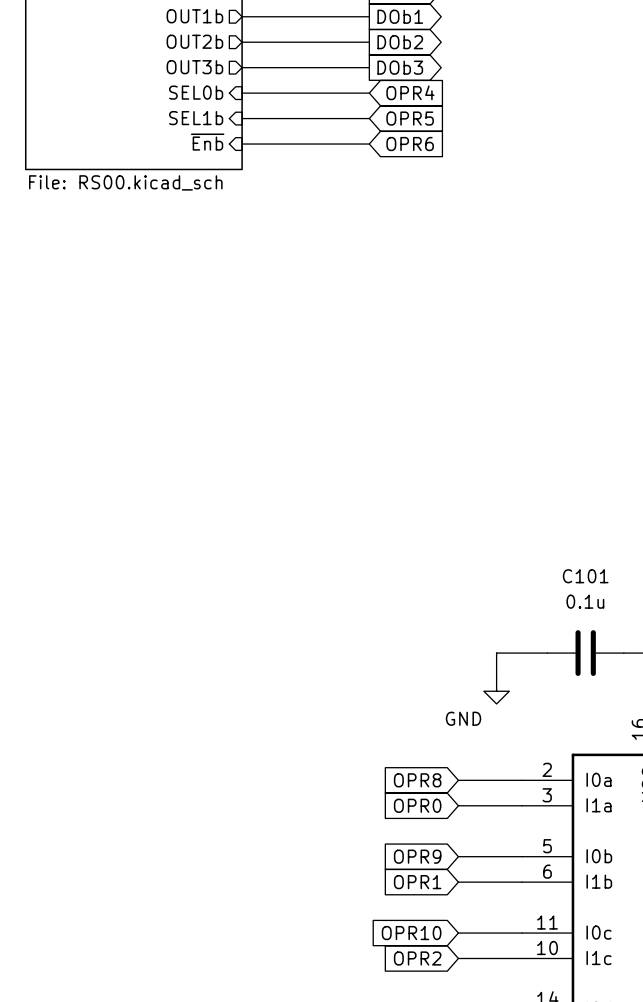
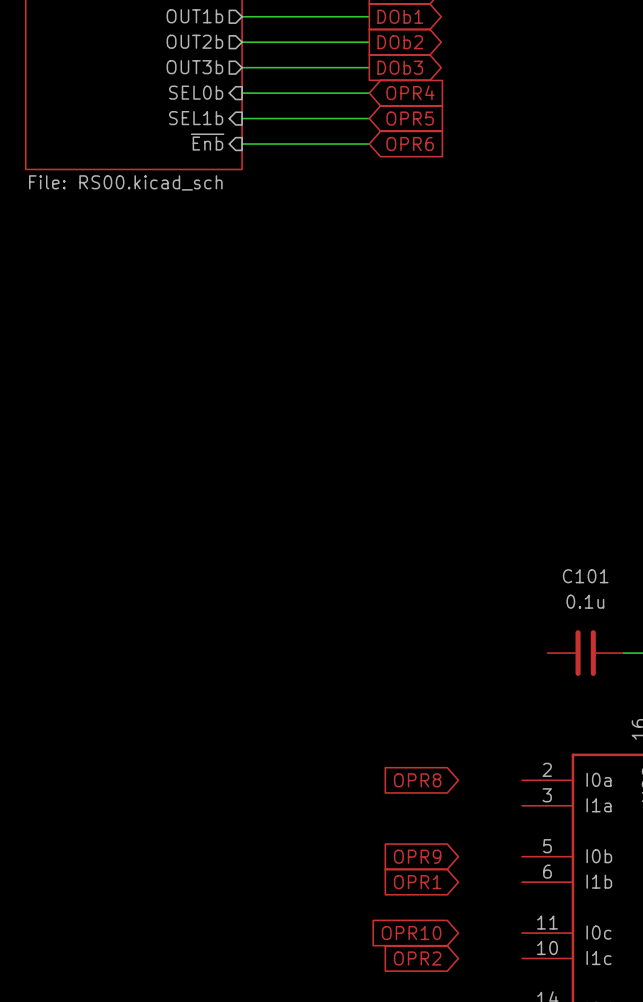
wire: (547, 653) (496, 653) (496, 678) -> none
power symbol: GND (496, 691) -> none
wire: (458, 780) (522, 780) -> none
global label: OPR0 (417, 805) -> none
wire: (458, 805) (522, 805) -> none
wire: (458, 856) (522, 856) -> none
wire: (458, 882) (522, 882) -> none
wire: (458, 933) (522, 933) -> none
wire: (458, 958) (522, 958) -> none

